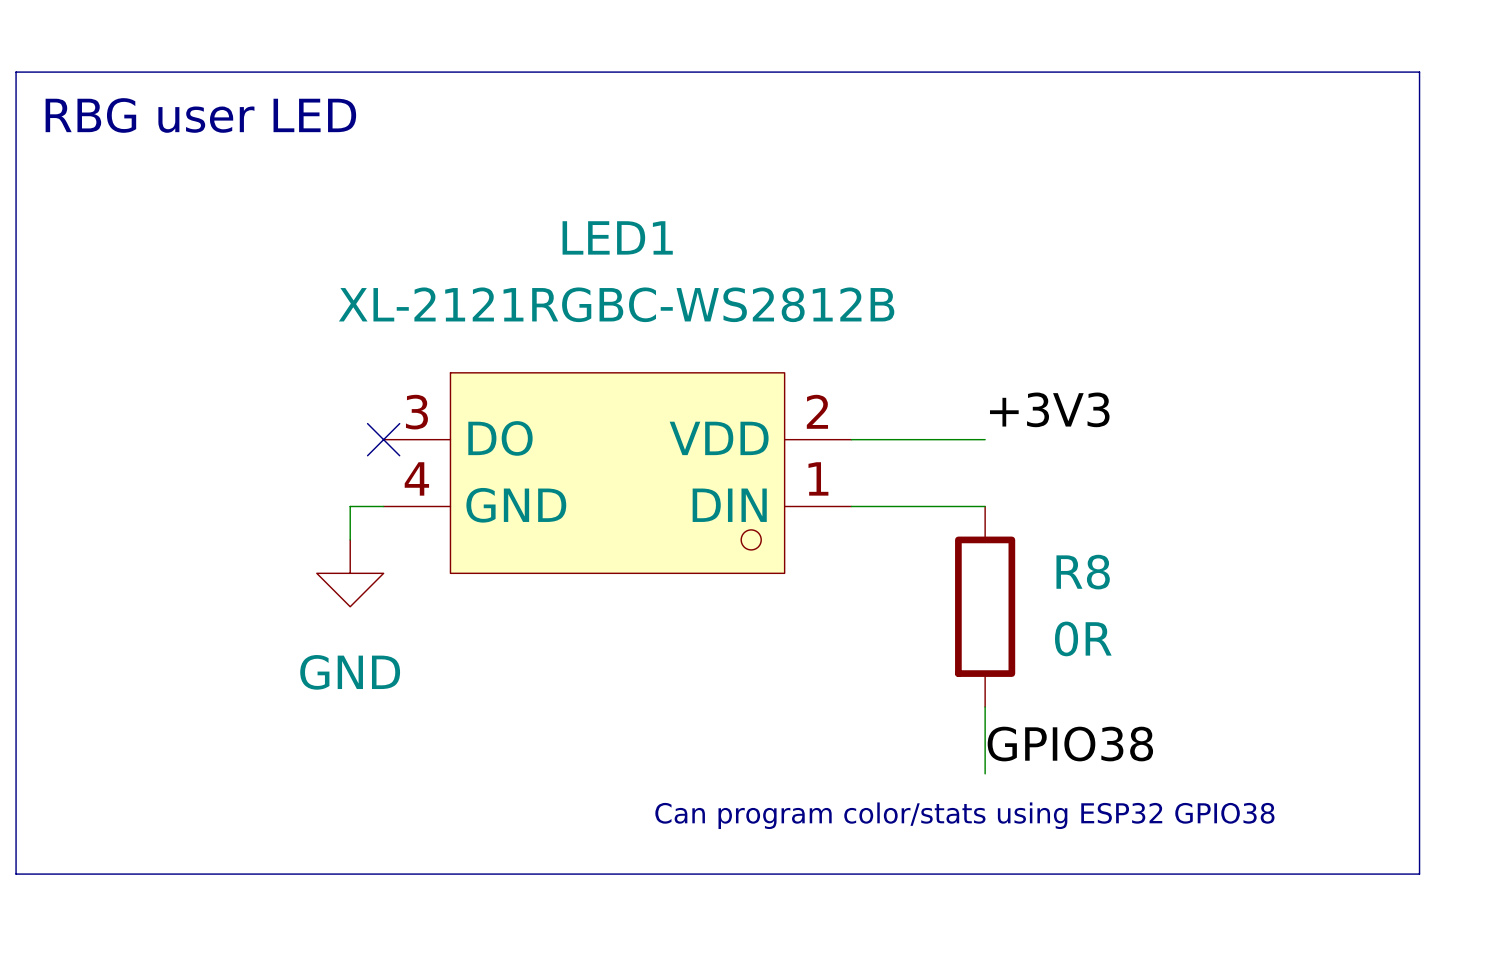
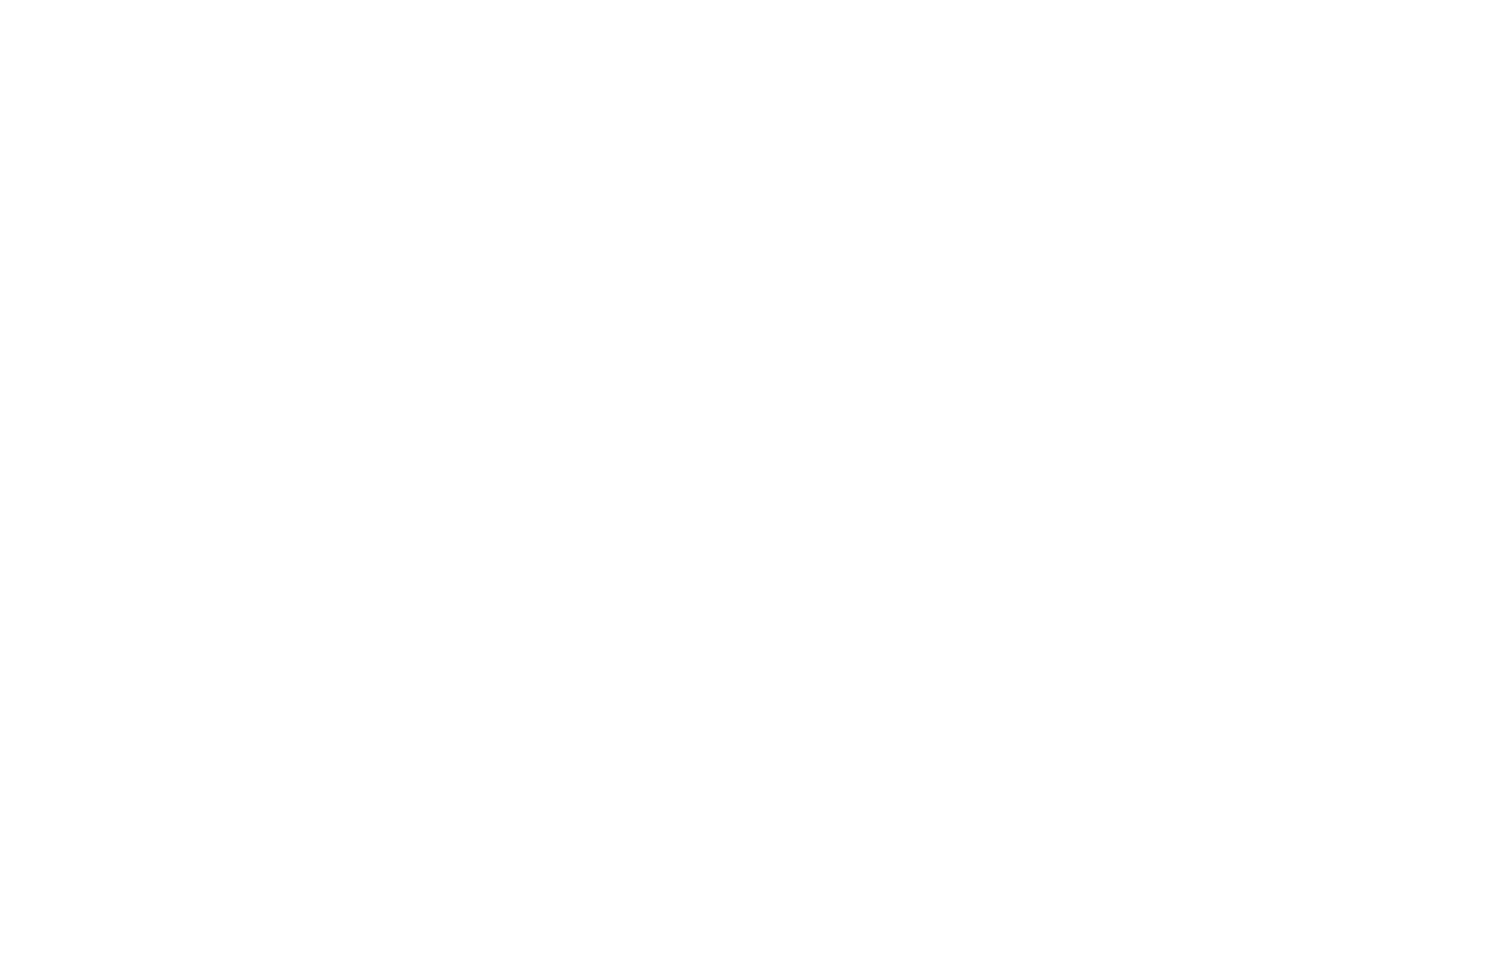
line: (16, 72) (1419, 72) (1419, 874) (16, 874) (16, 72) -> none
text: RBG user LED (200, 115) -> none
label: +3V3 (1049, 409) -> none
no-connect mark: (383, 439) -> none
wire: (851, 439) (985, 439) -> none
LED1: XL-2121RGBC-WS2812B (617, 473) -> none
wire: (383, 506) (350, 506) (350, 539) -> none
wire: (851, 506) (985, 506) -> none
power symbol: GND (350, 573) -> none
R8: 0R (985, 606) -> none
wire: (985, 706) (985, 773) -> none
label: GPIO38 (1070, 744) -> none
text: Can program color/stats using ESP32 GPIO38 (964, 815) -> none

